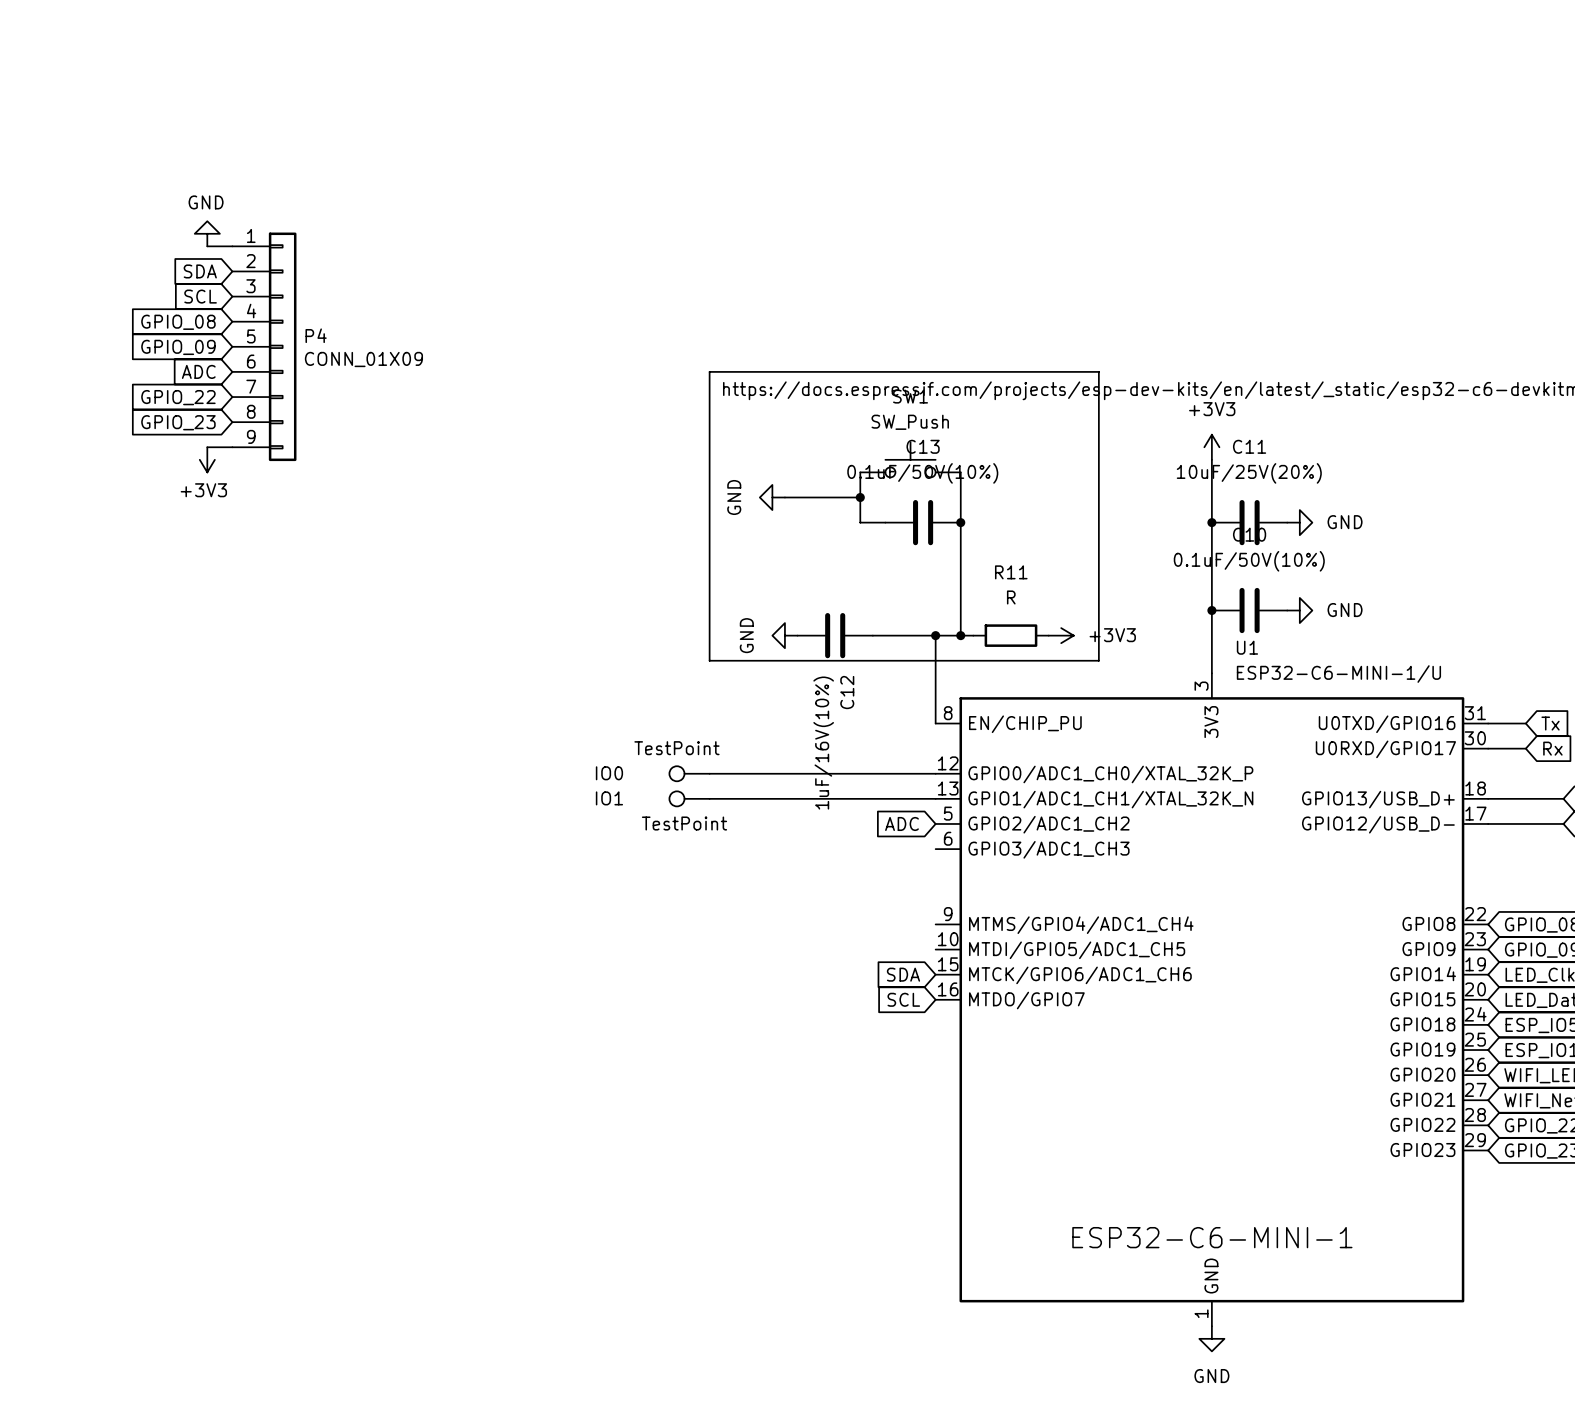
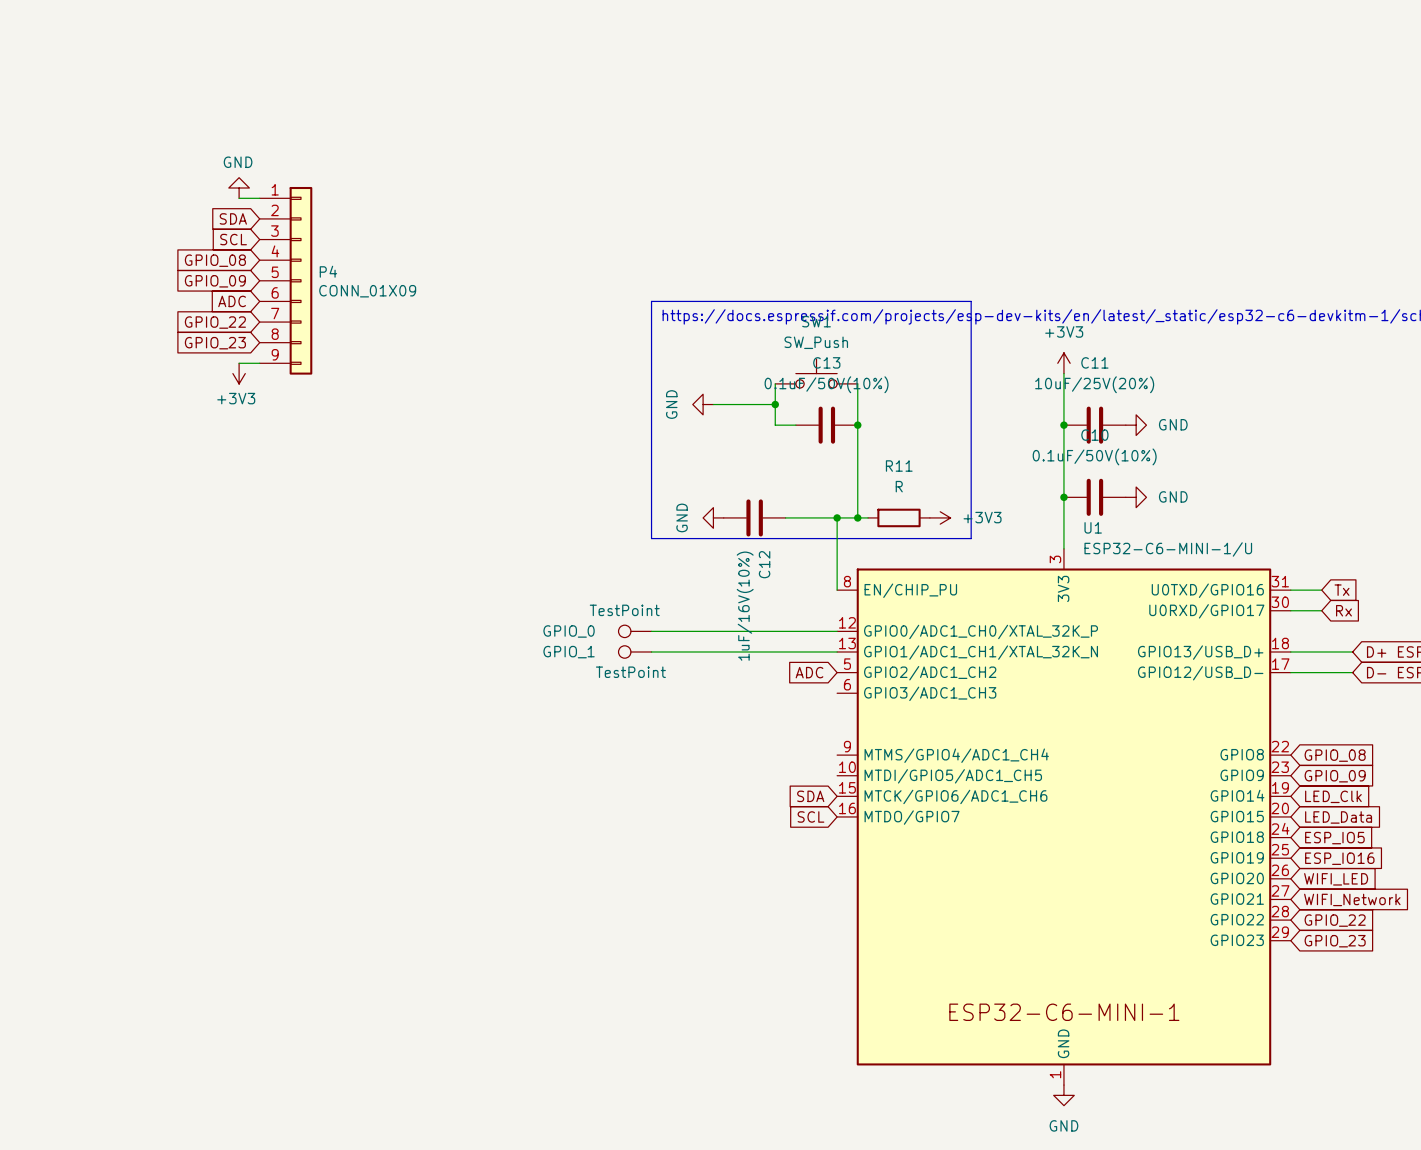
IO0 name: IO0 (609, 773) -> GPIO_0 (569, 631)
IO1 name: IO1 (609, 798) -> GPIO_1 (569, 652)

